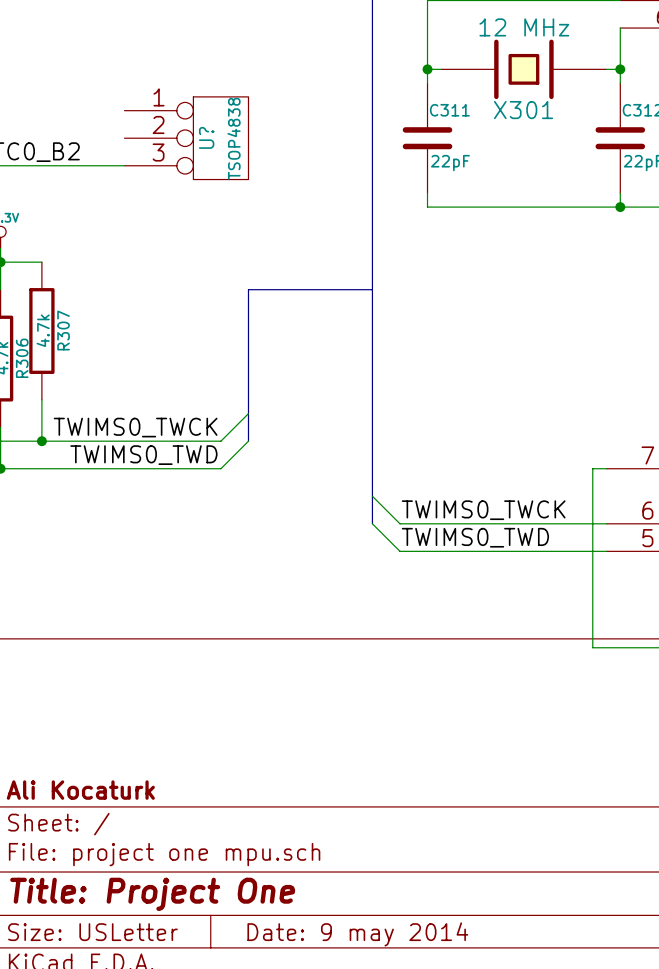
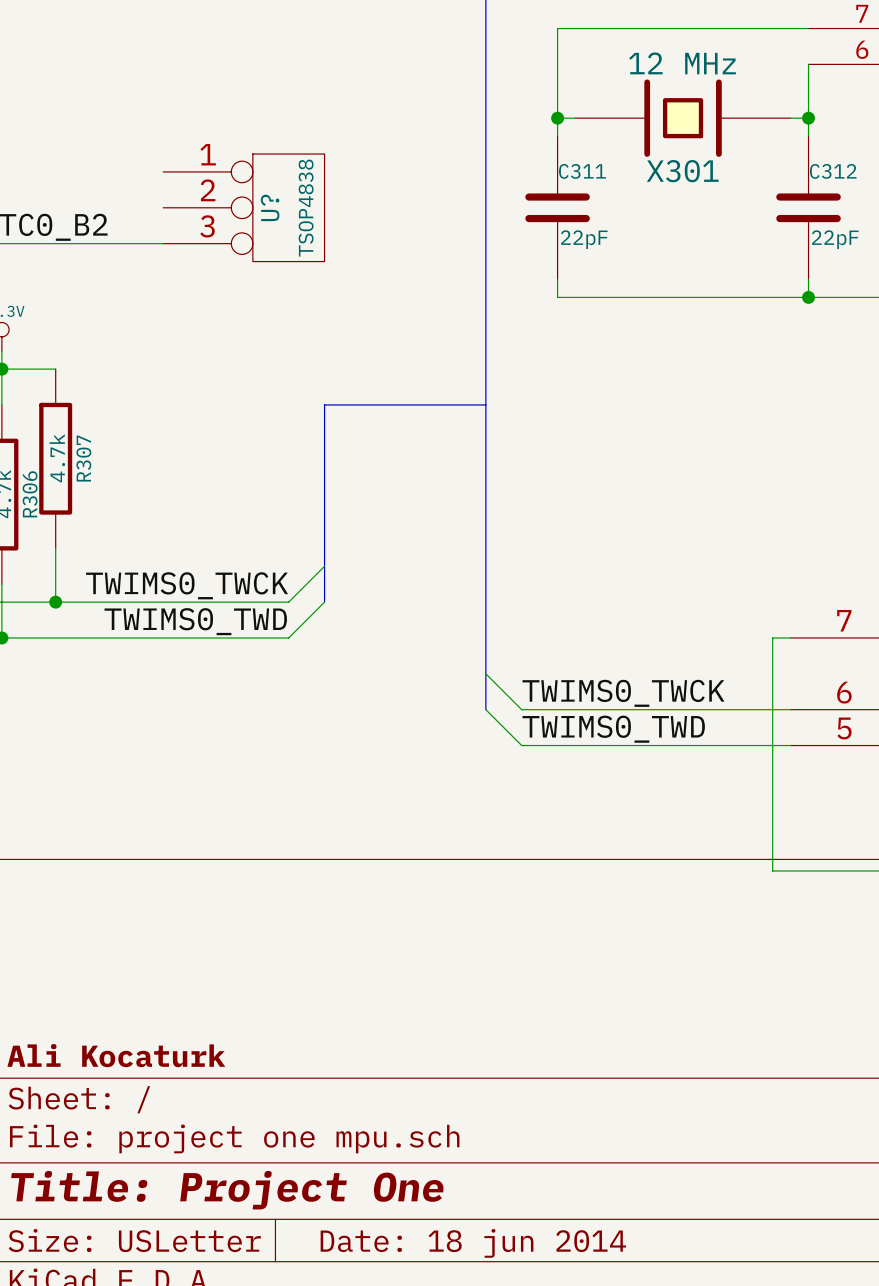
title block: Date: 9 may 2014 (357, 934) -> Date: 18 jun 2014 (473, 1243)

